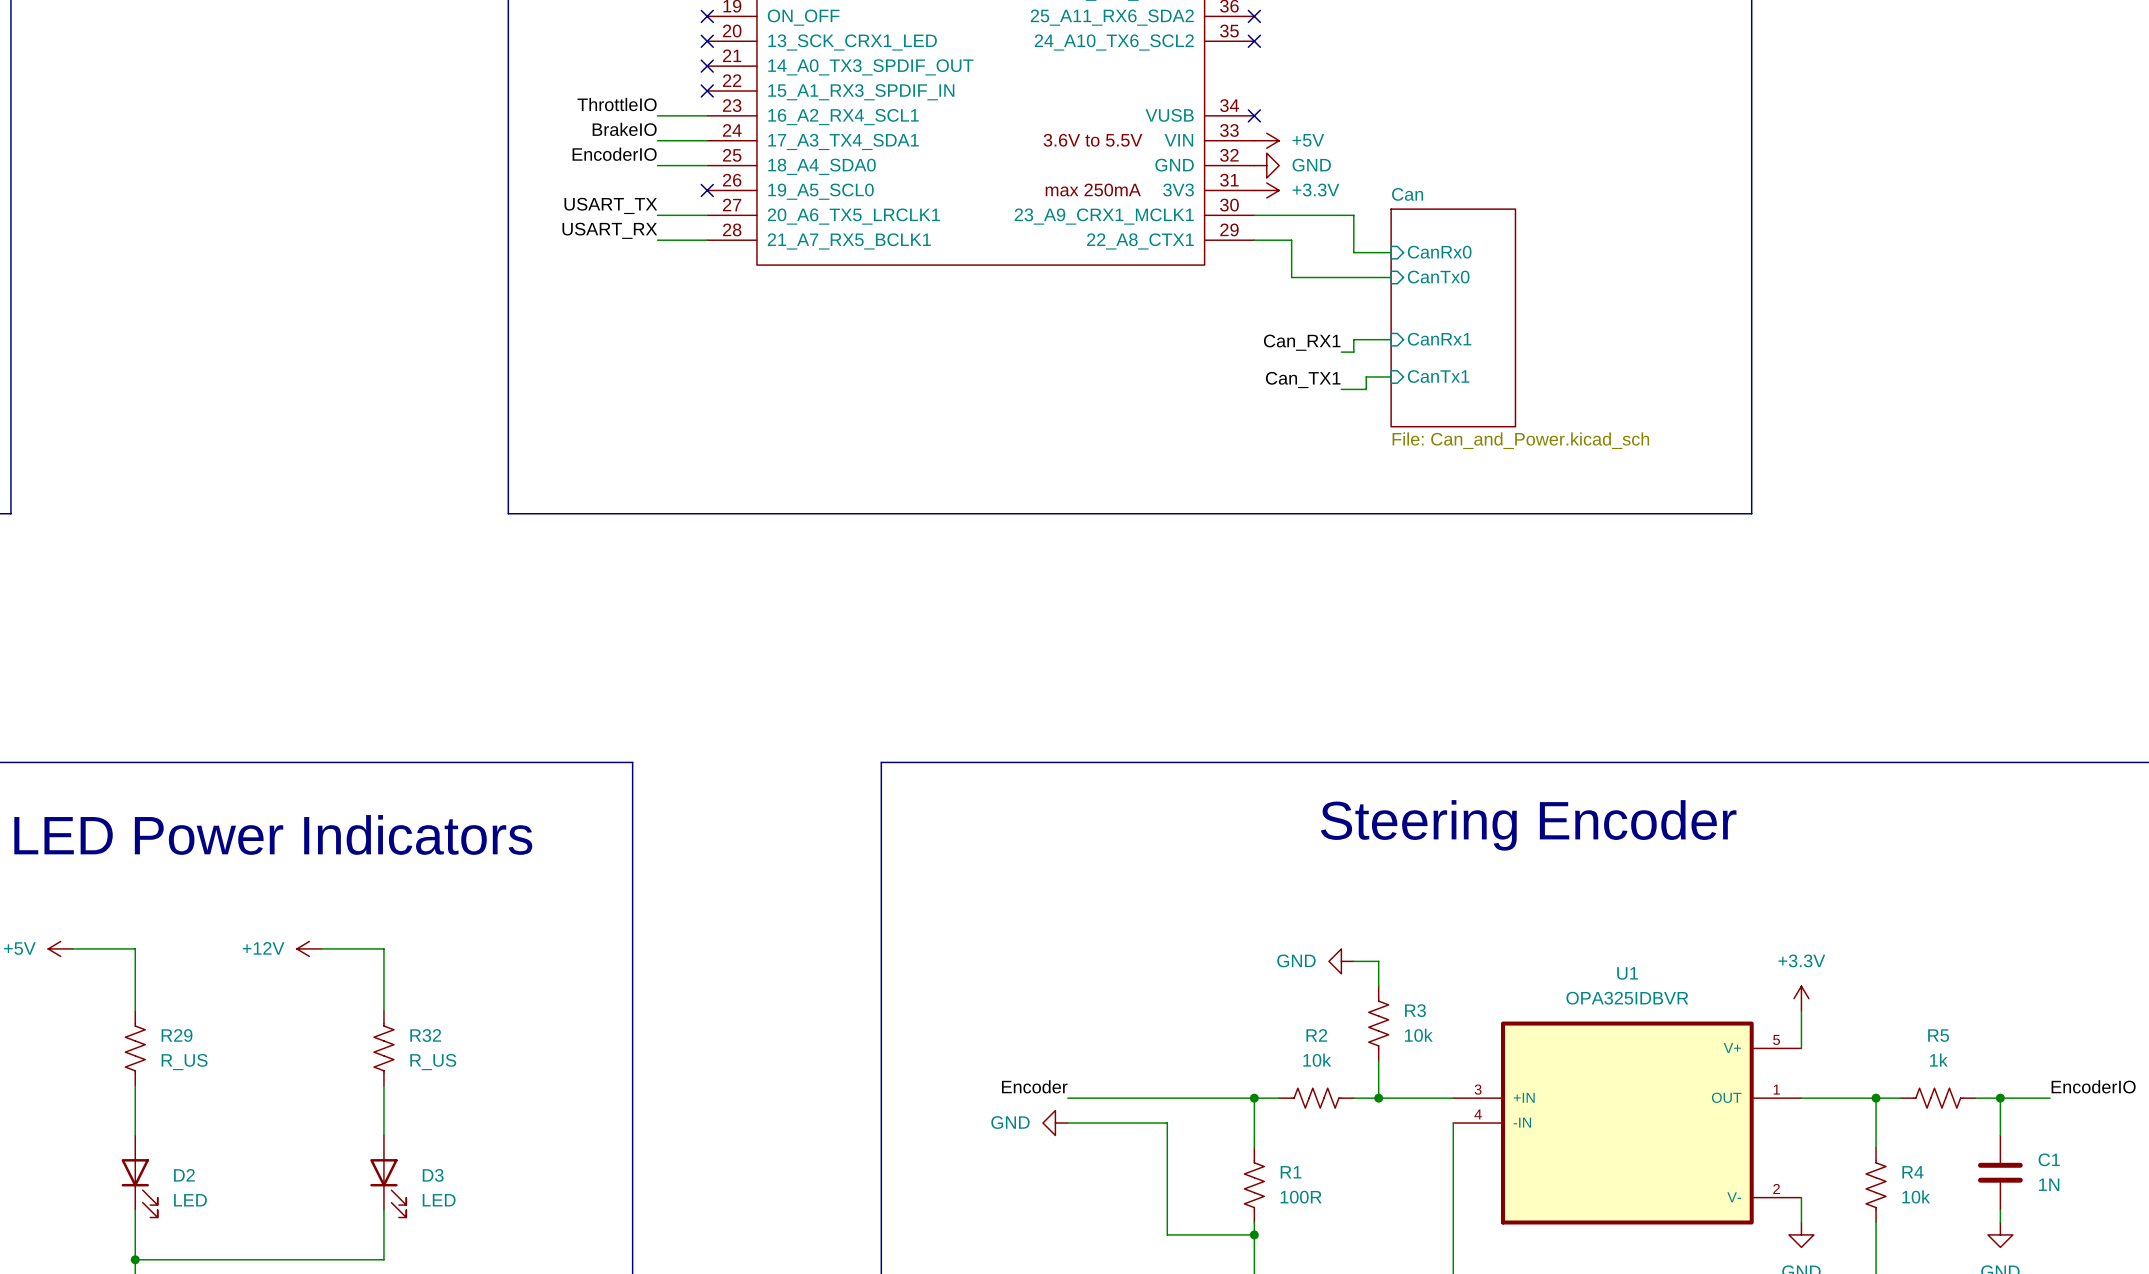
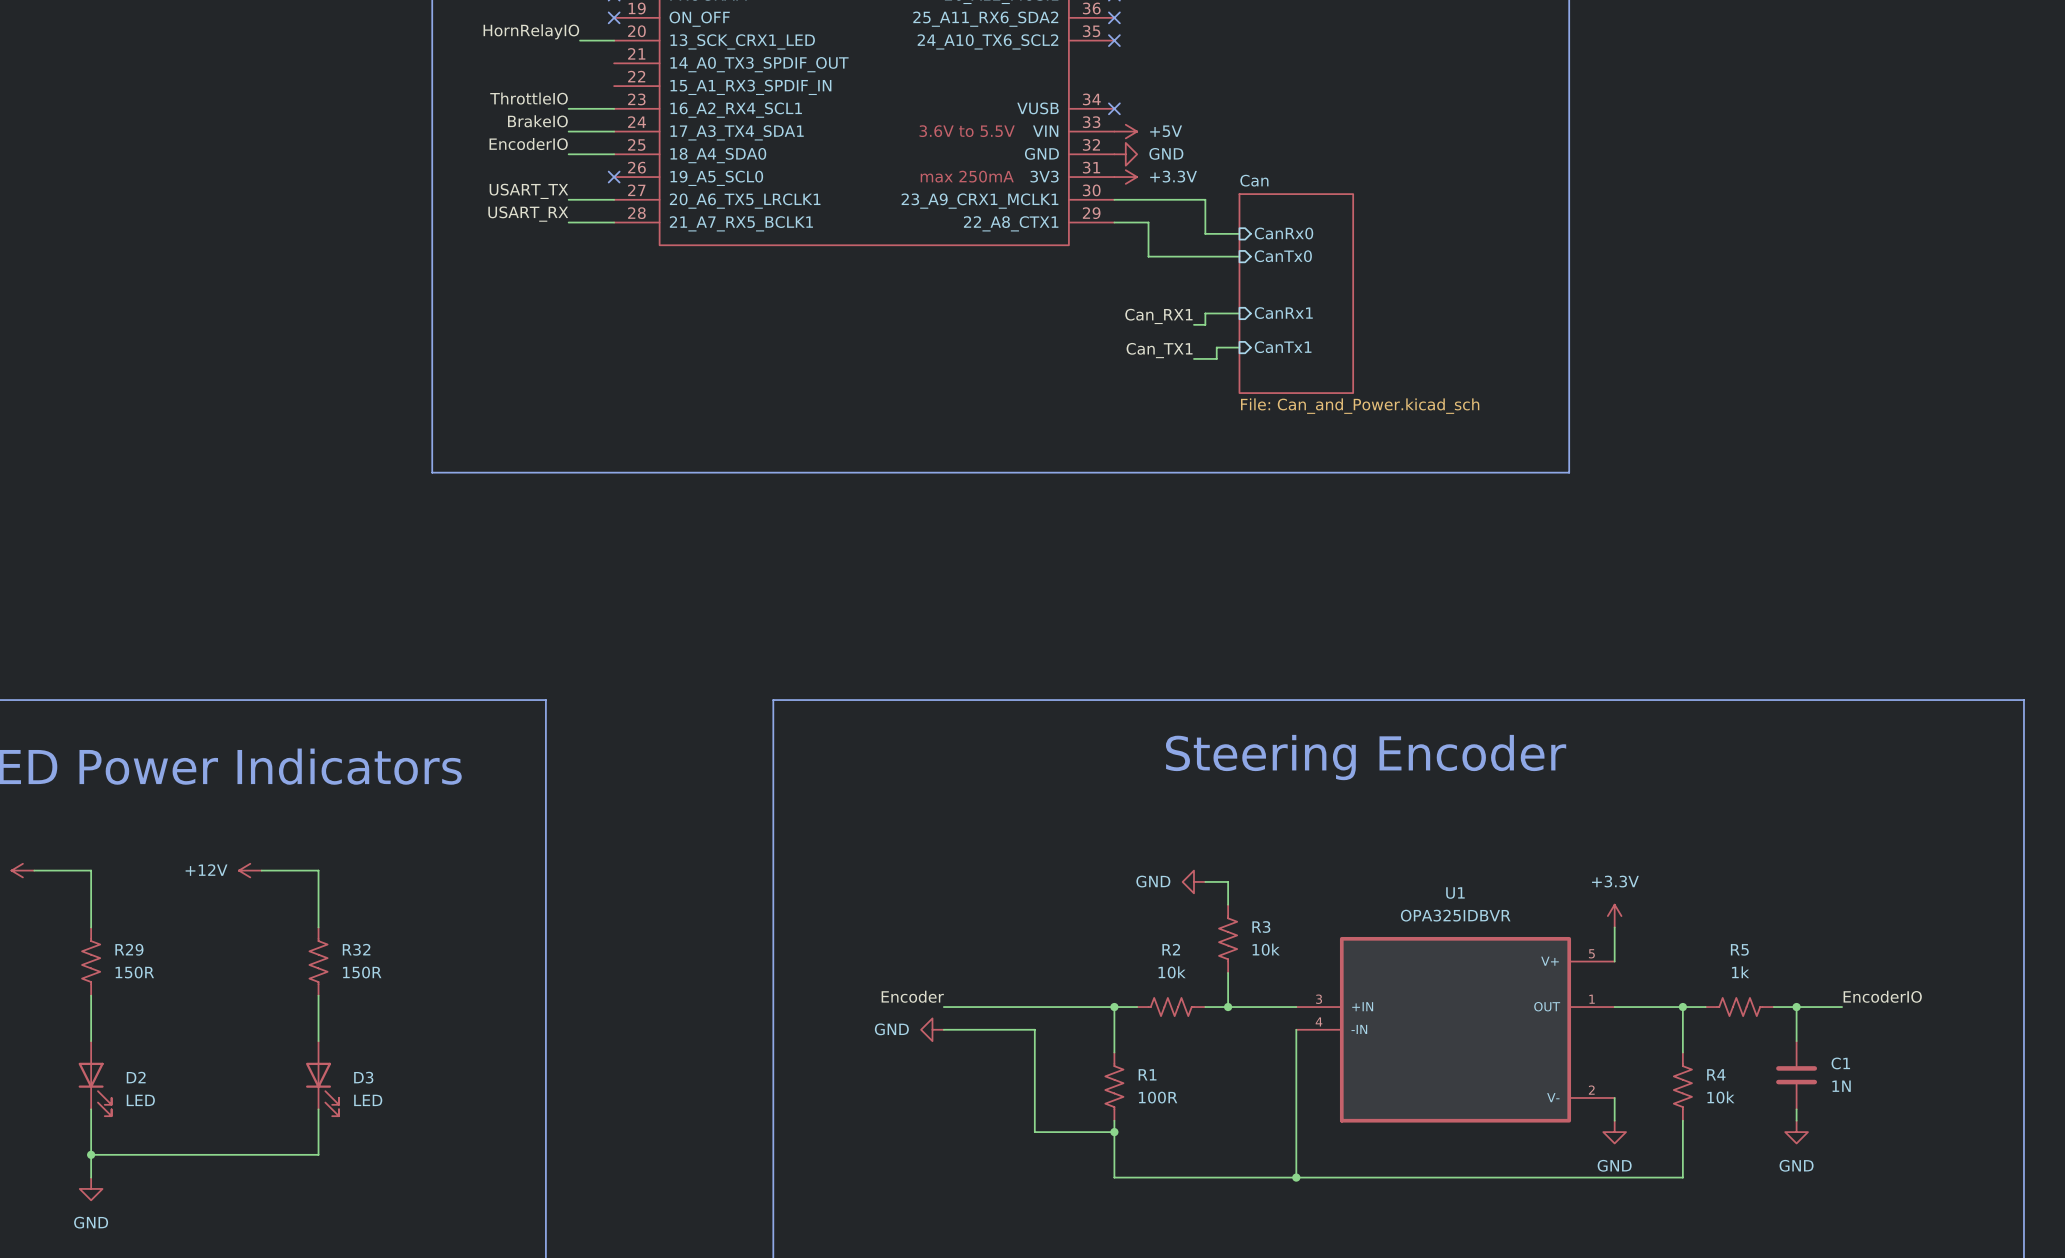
label: none -> HornRelayIO (531, 31)
wire: none -> (580, 40) (614, 40)
no-connect mark: (707, 41) -> none
no-connect mark: (707, 66) -> none
no-connect mark: (707, 90) -> none
R29 value: R_US (184, 1062) -> 150R (134, 972)
R32 value: R_US (433, 1062) -> 150R (362, 972)

